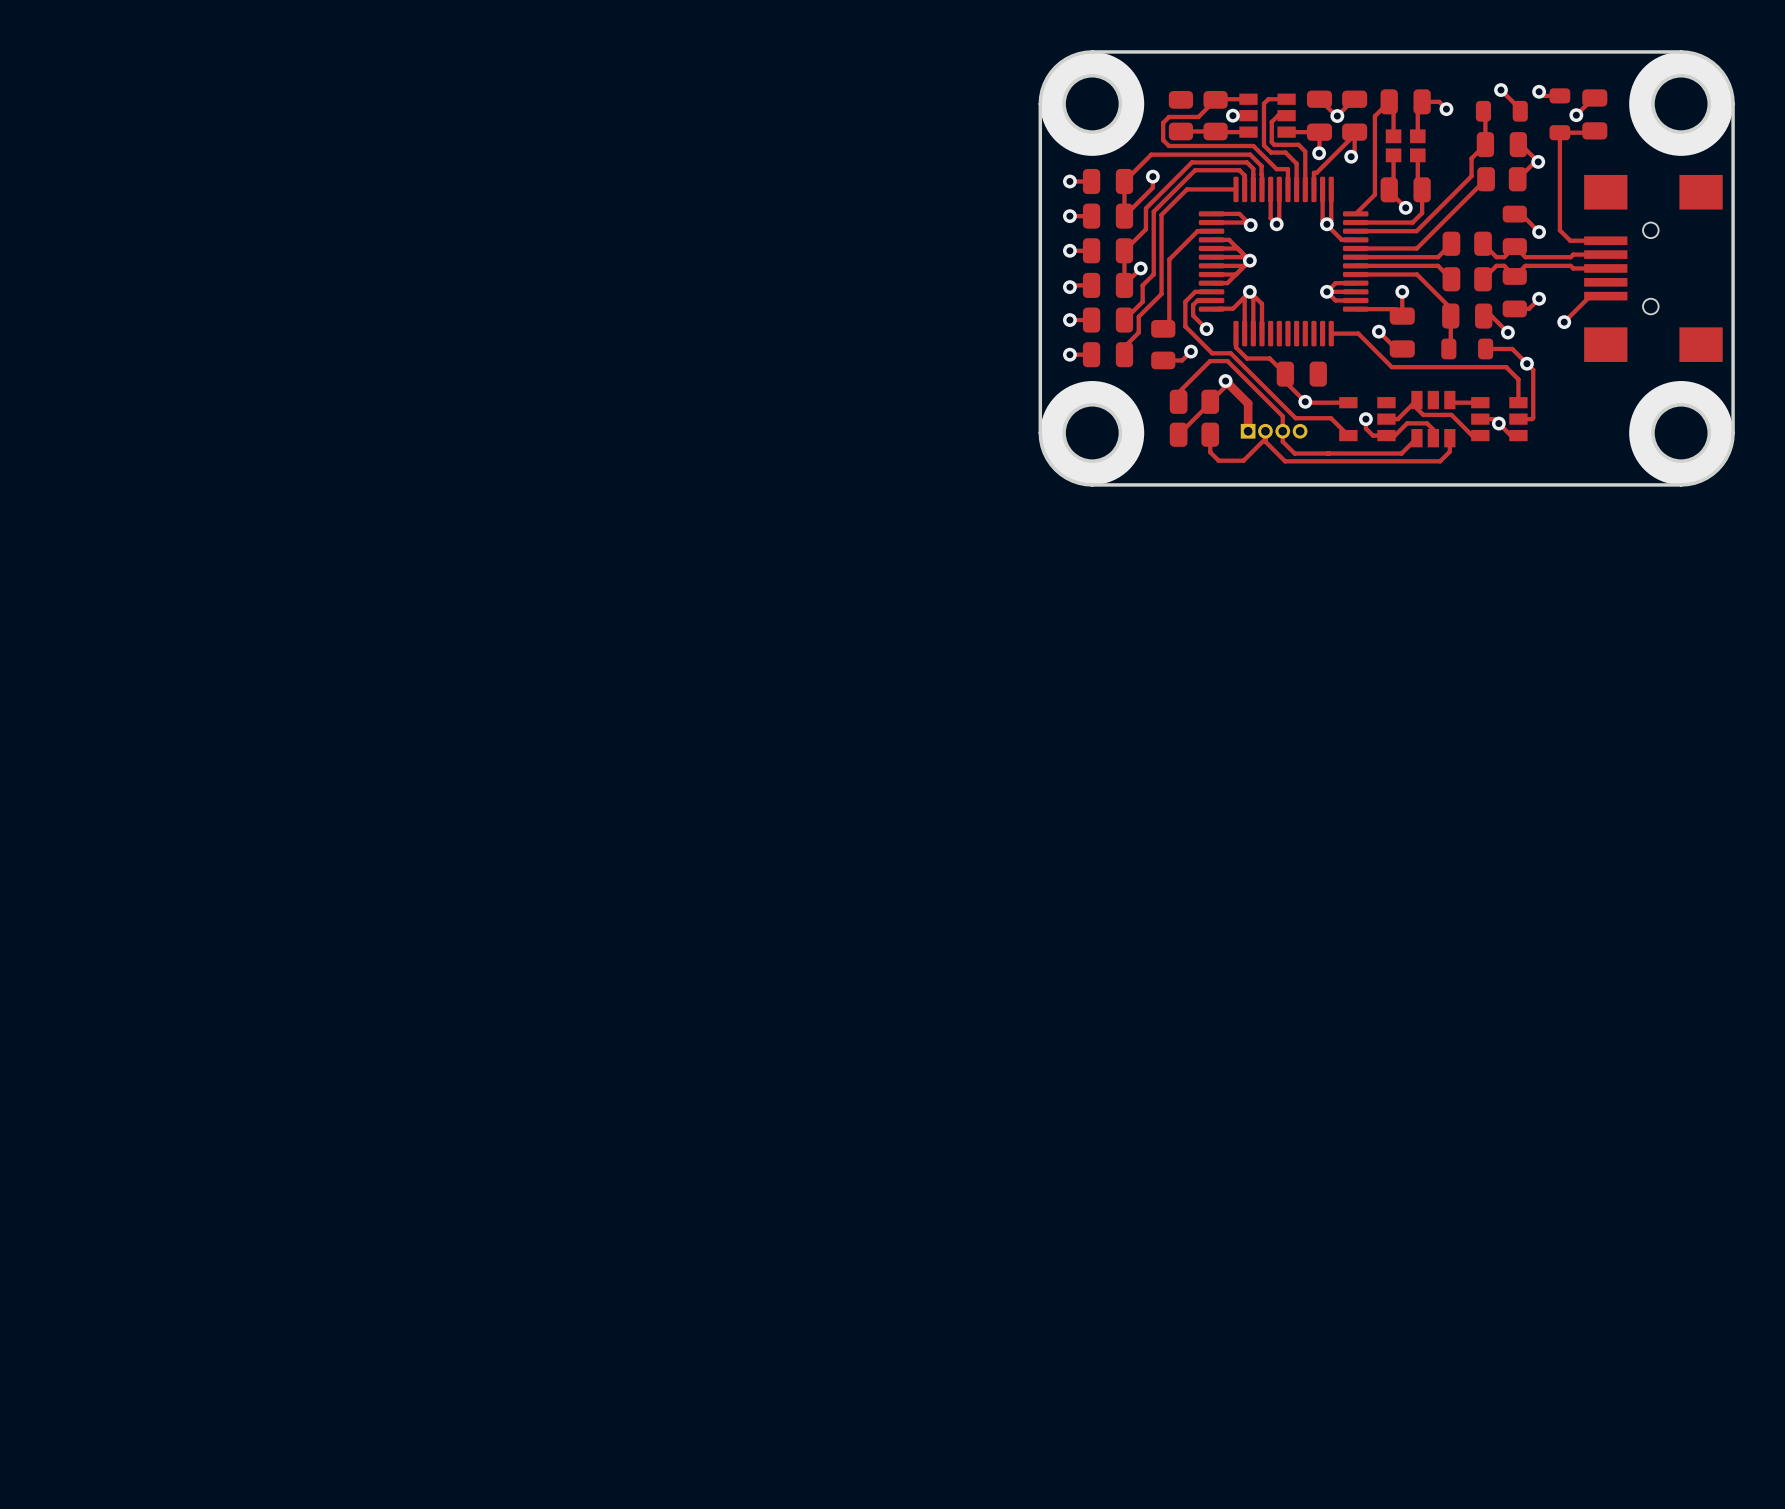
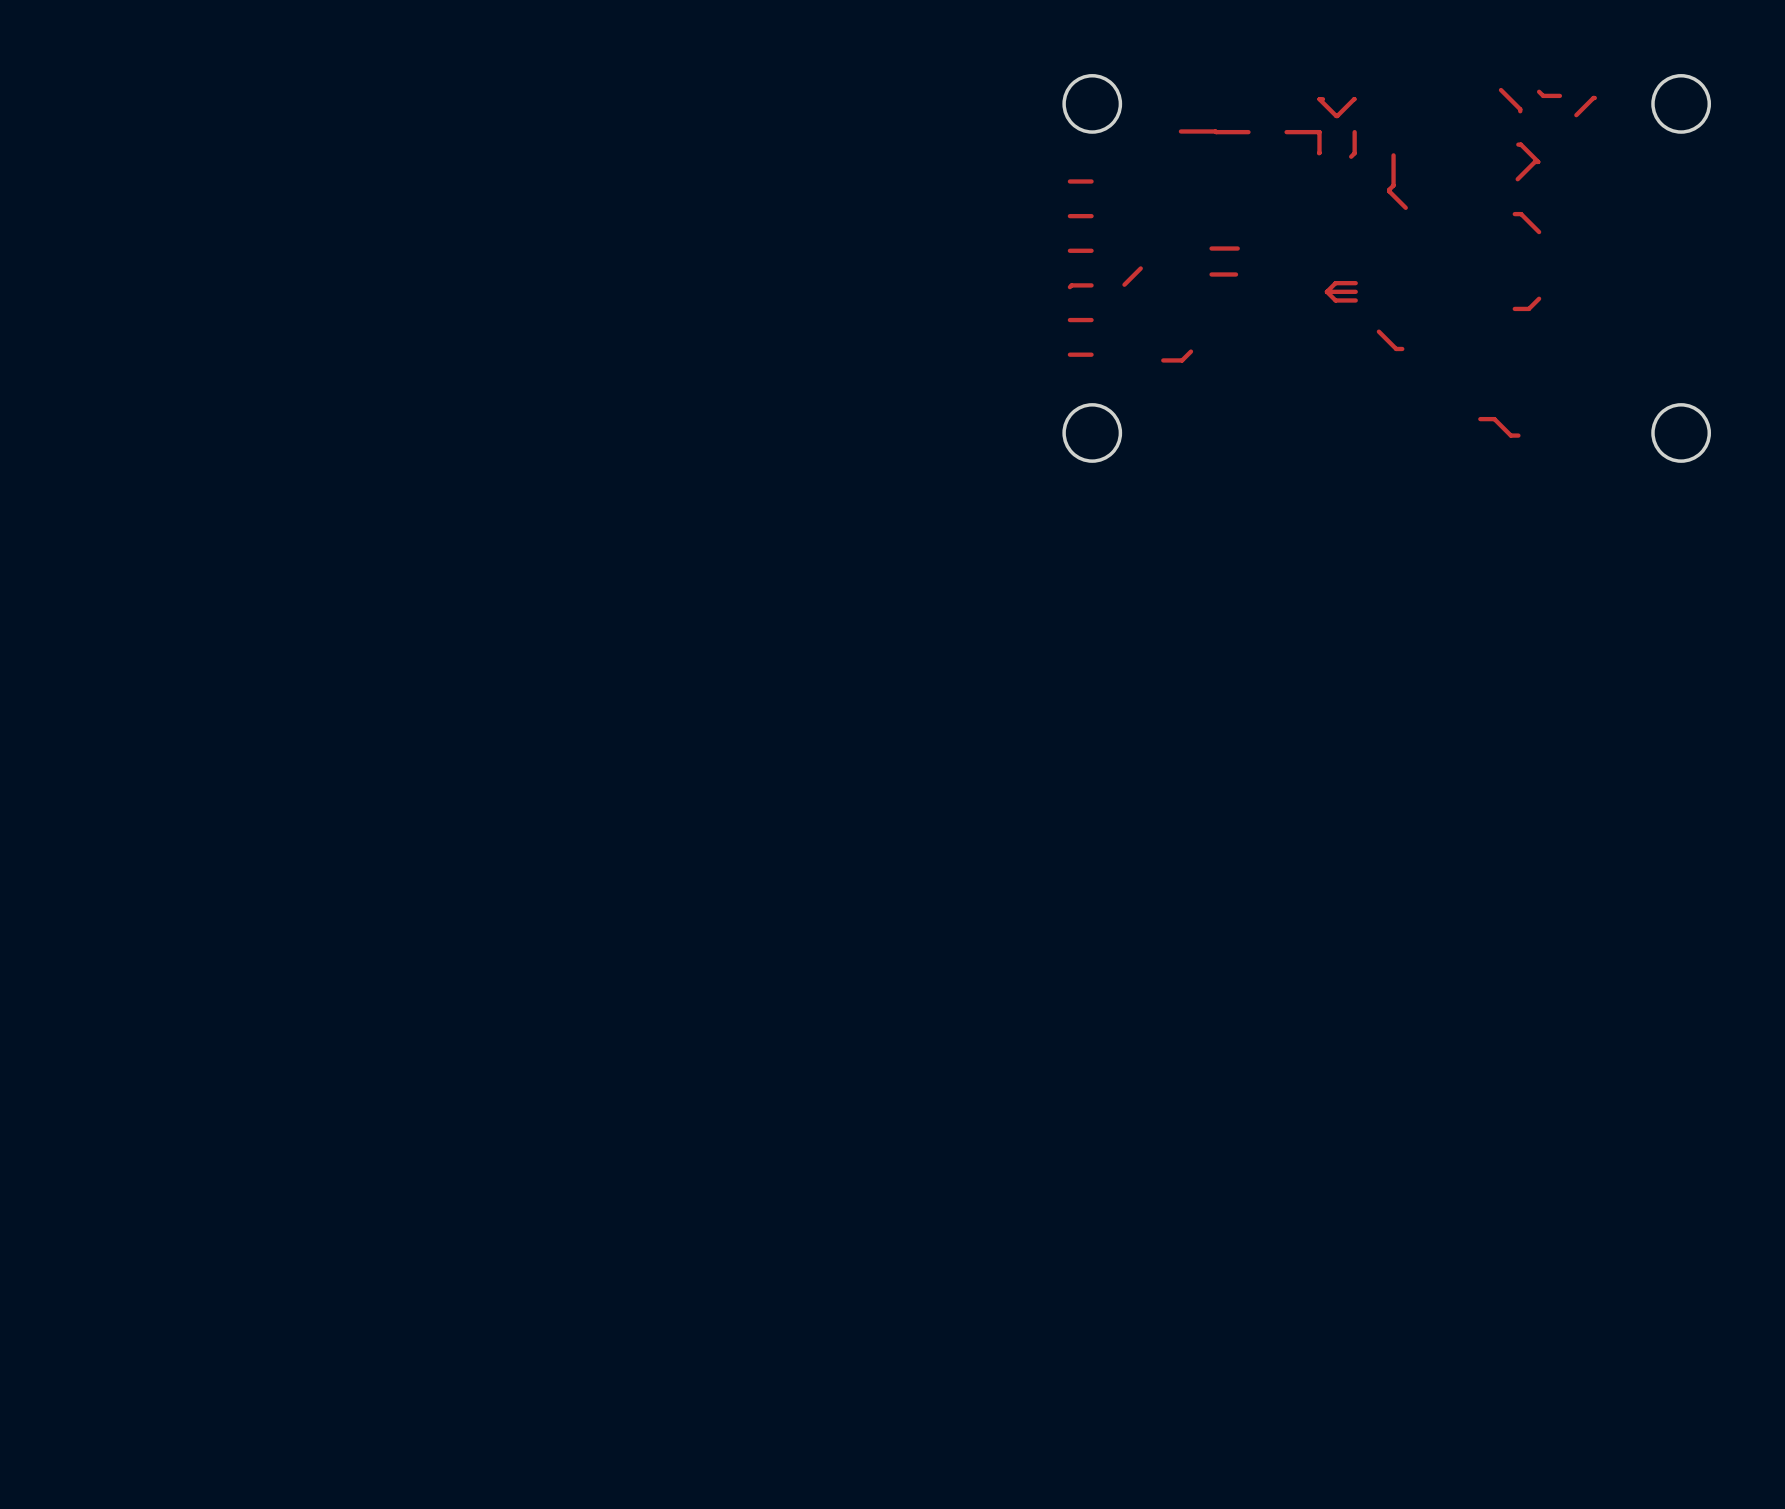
board edge: (1681, 51) (1092, 51) (1078, 53) (1066, 58) (1055, 67) (1047, 77) (1042, 90) (1040, 103) (1040, 432) (1042, 446) (1047, 458) (1055, 469) (1066, 477) (1078, 483) (1092, 484) (1681, 484) (1694, 483) (1707, 477) (1717, 469) (1726, 458) (1732, 439) (1733, 103) (1729, 84) (1717, 67) (1701, 55) (1681, 51) -> none
via: (1501, 90) -> none
via: (1539, 91) -> none
top track: (1248, 99) (1216, 99) (1198, 116) (1169, 116) (1163, 122) (1163, 140) (1169, 145) (1253, 145) (1276, 169) (1287, 169) (1287, 189) -> none
top track: (1286, 99) (1268, 99) (1263, 103) (1263, 145) (1271, 152) (1285, 152) (1296, 163) (1296, 189) -> none
part: (1405, 101) -> none
via: (1092, 103) -> none
via: (1681, 103) -> none
top track: (1446, 109) (1439, 101) (1422, 101) (1417, 106) (1418, 137) -> none
via: (1446, 109) -> none
top track: (1483, 111) (1485, 113) (1485, 144) (1471, 158) (1471, 176) (1416, 231) (1355, 231) -> none
part: (1501, 111) -> none
part: (1559, 114) -> none
part: (1594, 114) -> none
part: (1180, 115) -> none
part: (1215, 115) -> none
via: (1232, 115) -> none
part: (1267, 115) -> none
top track: (1286, 115) (1278, 115) (1271, 122) (1271, 142) (1274, 144) (1298, 144) (1305, 151) (1305, 189) -> none
part: (1319, 115) -> none
part: (1354, 115) -> none
via: (1576, 115) -> none
via: (1337, 116) -> none
top track: (1594, 130) (1592, 132) (1559, 132) (1559, 230) (1570, 240) (1605, 240) -> none
top track: (1354, 134) (1316, 172) (1313, 172) (1313, 189) -> none
top track: (1393, 136) (1393, 106) (1389, 101) (1374, 116) (1374, 194) (1355, 213) -> none
part: (1501, 144) -> none
part: (1405, 145) -> none
via: (1319, 153) -> none
top track: (1417, 155) (1417, 185) (1422, 189) (1422, 213) (1412, 222) (1355, 222) -> none
via: (1351, 156) -> none
via: (1538, 161) -> none
top track: (1152, 176) (1152, 187) (1124, 216) (1124, 181) (1151, 154) (1250, 154) (1261, 165) (1261, 189) -> none
via: (1152, 176) -> none
top track: (1486, 179) (1416, 248) (1355, 248) -> none
part: (1501, 179) -> none
via: (1069, 181) -> none
part: (1108, 181) -> none
top track: (1236, 189) (1186, 189) (1161, 214) (1161, 294) (1138, 316) (1138, 332) (1124, 346) (1124, 354) -> none
top track: (1244, 189) (1244, 175) (1239, 170) (1195, 170) (1153, 211) (1153, 274) (1142, 285) (1142, 301) (1124, 320) -> none
top track: (1253, 189) (1253, 168) (1246, 162) (1191, 162) (1145, 208) (1145, 229) (1124, 250) (1124, 285) -> none
top track: (1279, 189) (1279, 221) (1276, 224) (1270, 218) (1270, 189) -> none
top track: (1322, 189) (1322, 219) (1326, 224) -> none
top track: (1331, 189) (1331, 219) (1326, 224) -> none
part: (1405, 189) -> none
via: (1405, 207) -> none
top track: (1211, 213) (1239, 213) (1250, 225) -> none
via: (1069, 216) -> none
part: (1108, 216) -> none
top track: (1248, 222) (1211, 222) -> none
via: (1276, 224) -> none
top track: (1326, 224) (1341, 239) (1355, 239) -> none
via: (1326, 224) -> none
via: (1250, 225) -> none
part: (1514, 230) -> none
top track: (1211, 231) (1197, 231) (1169, 259) (1169, 322) (1163, 328) -> none
via: (1539, 232) -> none
top track: (1211, 239) (1229, 239) (1249, 260) (1227, 283) (1211, 283) -> none
top track: (1451, 243) (1438, 257) (1356, 257) -> none
part: (1467, 243) -> none
top track: (1483, 243) (1496, 257) (1504, 257) (1514, 246) (1525, 257) (1605, 254) -> none
via: (1069, 250) -> none
part: (1108, 250) -> none
top track: (1246, 257) (1211, 257) -> none
via: (1249, 260) -> none
part: (1283, 261) -> none
top track: (1244, 265) (1211, 265) -> none
top track: (1356, 265) (1438, 265) (1451, 279) -> none
via: (1140, 268) -> none
top track: (1605, 268) (1525, 265) (1514, 276) (1504, 265) (1496, 265) (1483, 279) -> none
part: (1653, 268) -> none
top track: (1355, 274) (1417, 274) (1450, 308) (1450, 347) (1448, 348) -> none
part: (1467, 279) -> none
part: (1108, 285) -> none
via: (1069, 287) -> none
top track: (1211, 291) (1195, 291) (1185, 301) (1185, 326) (1212, 353) (1230, 353) (1295, 418) (1331, 418) (1348, 435) -> none
via: (1249, 291) -> none
via: (1326, 291) -> none
top track: (1402, 291) (1402, 316) (1395, 309) (1355, 309) -> none
via: (1402, 291) -> none
part: (1514, 292) -> none
top track: (1253, 295) (1253, 333) -> none
top track: (1605, 296) (1590, 296) (1564, 322) -> none
top track: (1244, 297) (1244, 333) -> none
via: (1539, 298) -> none
top track: (1211, 300) (1197, 300) (1193, 304) (1193, 315) (1206, 329) -> none
top track: (1211, 309) (1232, 308) (1249, 291) (1261, 303) (1261, 333) -> none
part: (1467, 316) -> none
top track: (1483, 316) (1491, 316) (1507, 332) -> none
via: (1069, 320) -> none
part: (1108, 320) -> none
via: (1564, 322) -> none
via: (1206, 329) -> none
via: (1378, 331) -> none
part: (1402, 332) -> none
via: (1507, 332) -> none
top track: (1236, 333) (1236, 347) (1246, 358) (1269, 358) (1285, 374) (1285, 381) (1306, 402) (1348, 402) -> none
top track: (1331, 333) (1358, 333) (1391, 367) (1506, 367) (1518, 379) (1518, 402) -> none
part: (1163, 344) -> none
part: (1467, 348) -> none
top track: (1485, 348) (1512, 348) (1533, 369) (1533, 417) (1518, 419) -> none
via: (1190, 351) -> none
via: (1069, 354) -> none
part: (1108, 354) -> none
via: (1526, 363) -> none
part: (1301, 374) -> none
via: (1225, 381) -> none
top track: (1449, 400) (1452, 402) (1480, 402) -> none
top track: (1178, 401) (1178, 392) (1210, 361) (1227, 361) (1282, 416) (1282, 441) (1294, 453) (1401, 453) (1416, 438) -> none
part: (1194, 401) -> none
top track: (1210, 401) (1225, 386) (1225, 381) (1248, 403) (1248, 431) -> none
via: (1305, 401) -> none
top track: (1210, 403) (1178, 434) (1178, 433) -> none
top track: (1365, 419) (1365, 428) (1372, 435) (1394, 435) (1407, 423) (1427, 423) (1433, 429) (1433, 438) -> none
via: (1365, 419) -> none
part: (1367, 419) -> none
top track: (1386, 419) (1397, 419) (1416, 400) (1416, 408) (1423, 414) (1451, 414) (1472, 435) (1480, 435) -> none
part: (1433, 419) -> none
part: (1499, 419) -> none
via: (1498, 423) -> none
top track: (1265, 431) (1265, 441) (1285, 461) (1440, 461) (1449, 451) (1449, 438) -> none
part: (1274, 431) -> none
via: (1092, 432) -> none
via: (1681, 432) -> none
part: (1194, 434) -> none
top track: (1210, 434) (1210, 452) (1218, 460) (1243, 460) (1265, 438) -> none

